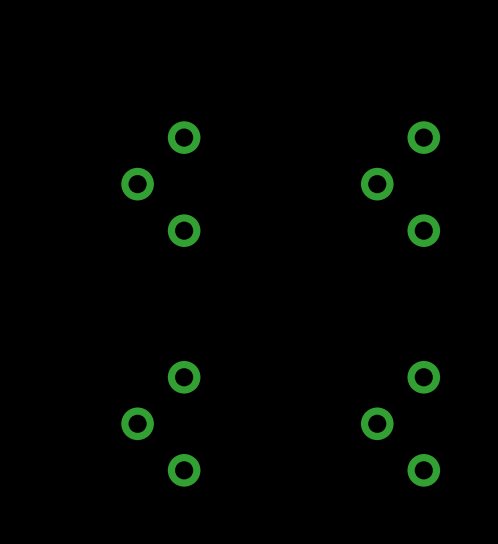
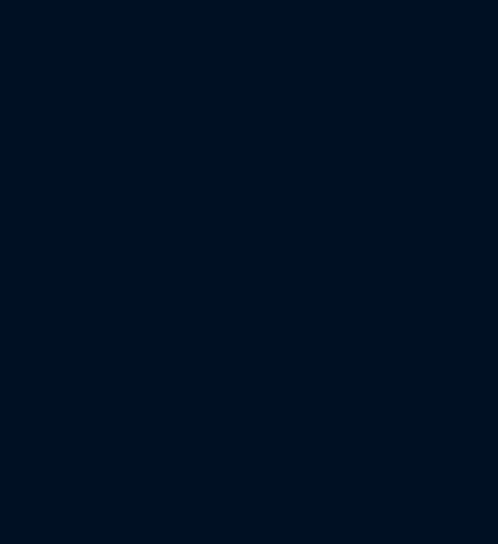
part: (160, 184) -> none
part: (400, 184) -> none
part: (160, 423) -> none
part: (400, 423) -> none

